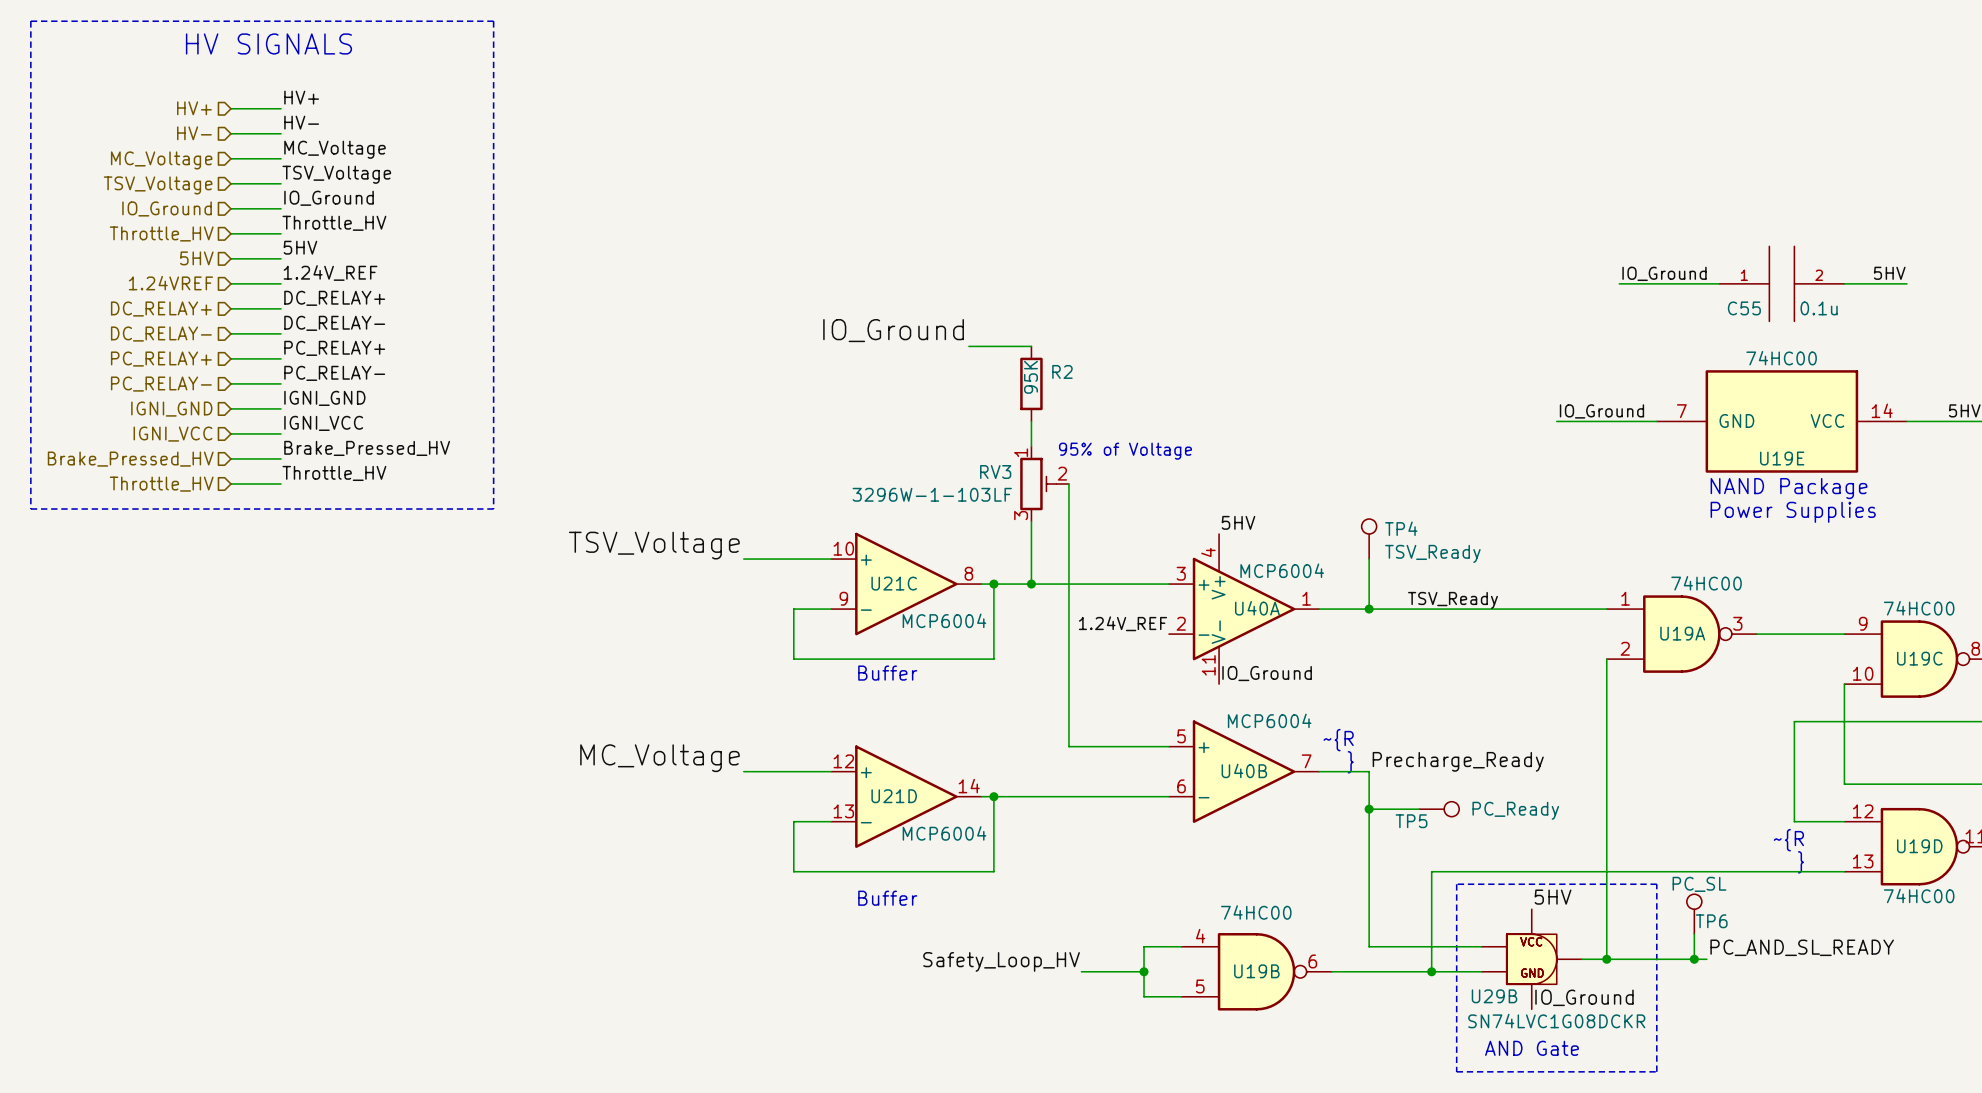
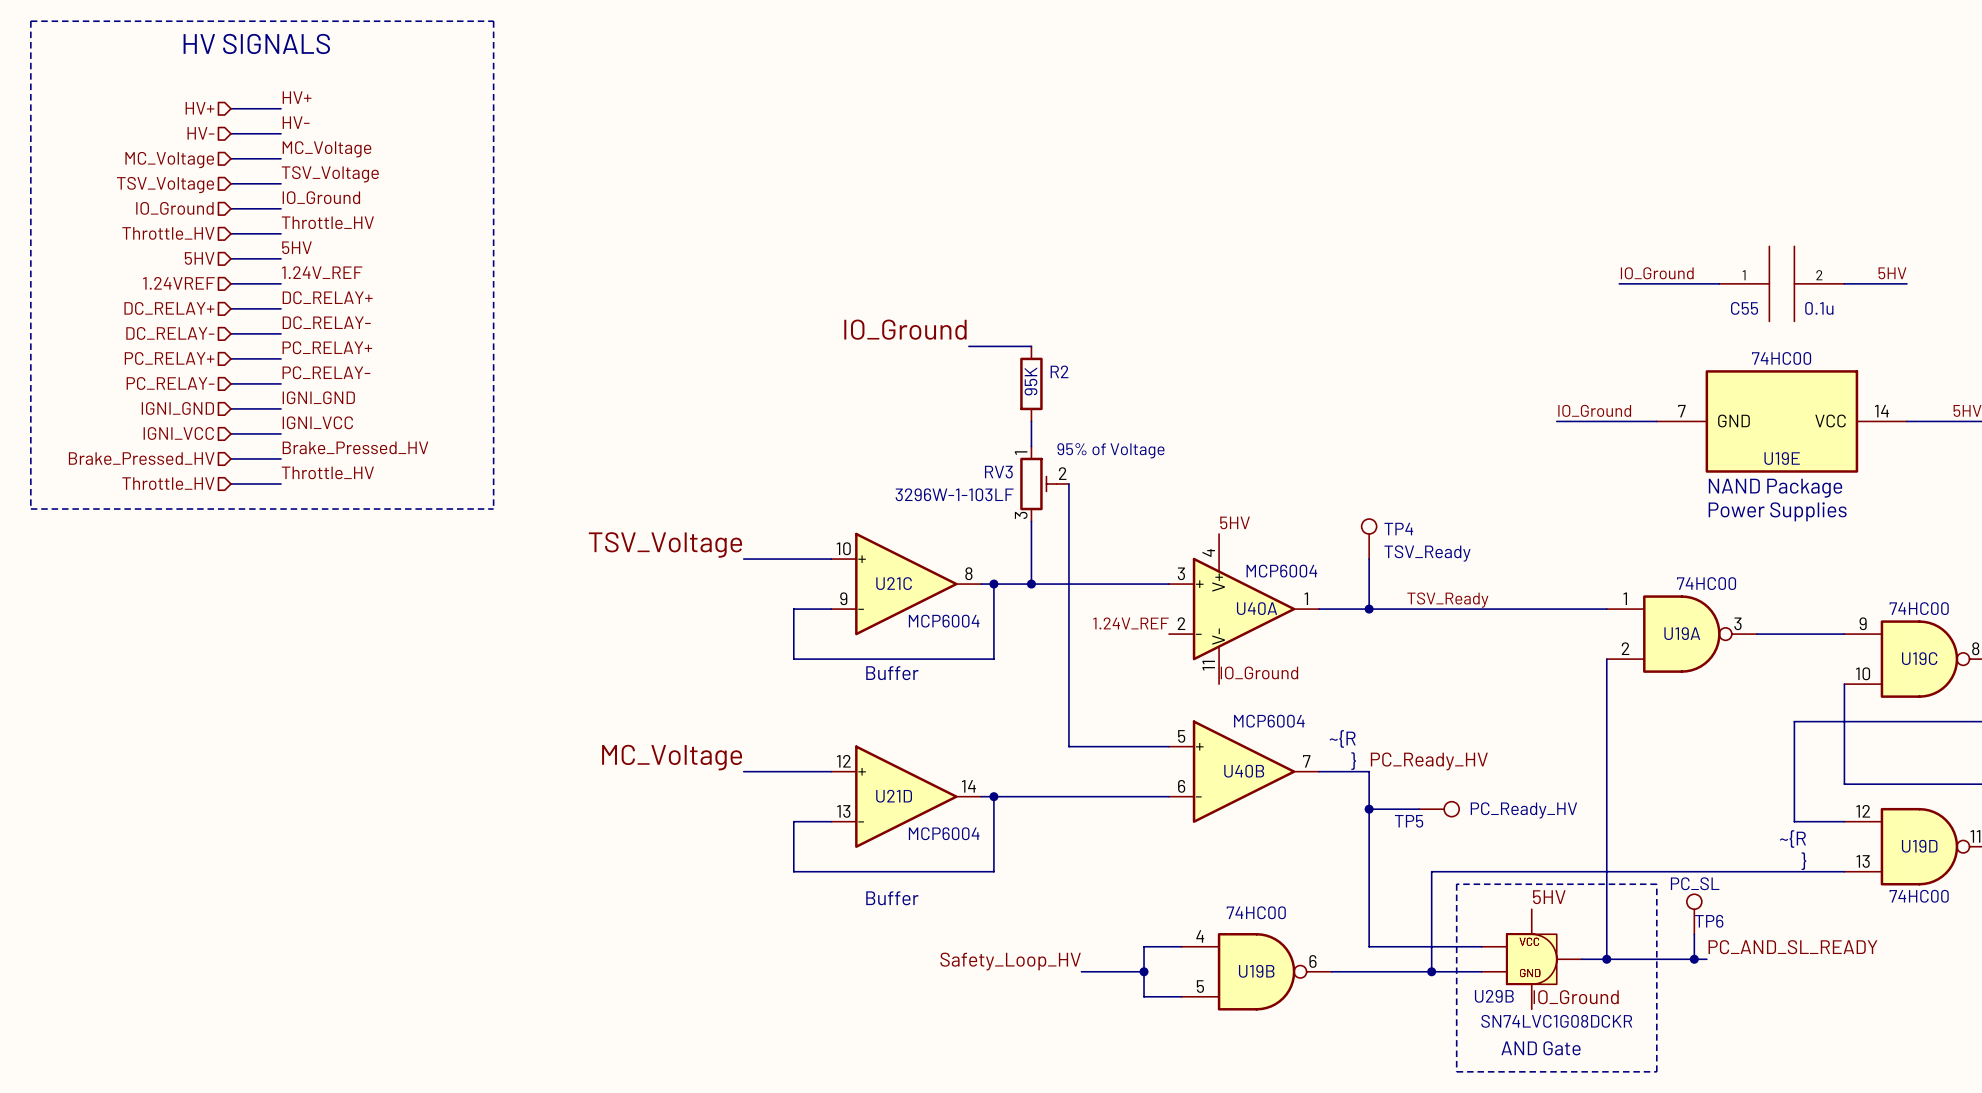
label: Precharge_Ready (1458, 761) -> PC_Ready_HV (1429, 761)
TP5 value: PC_Ready (1515, 810) -> PC_Ready_HV (1523, 810)

